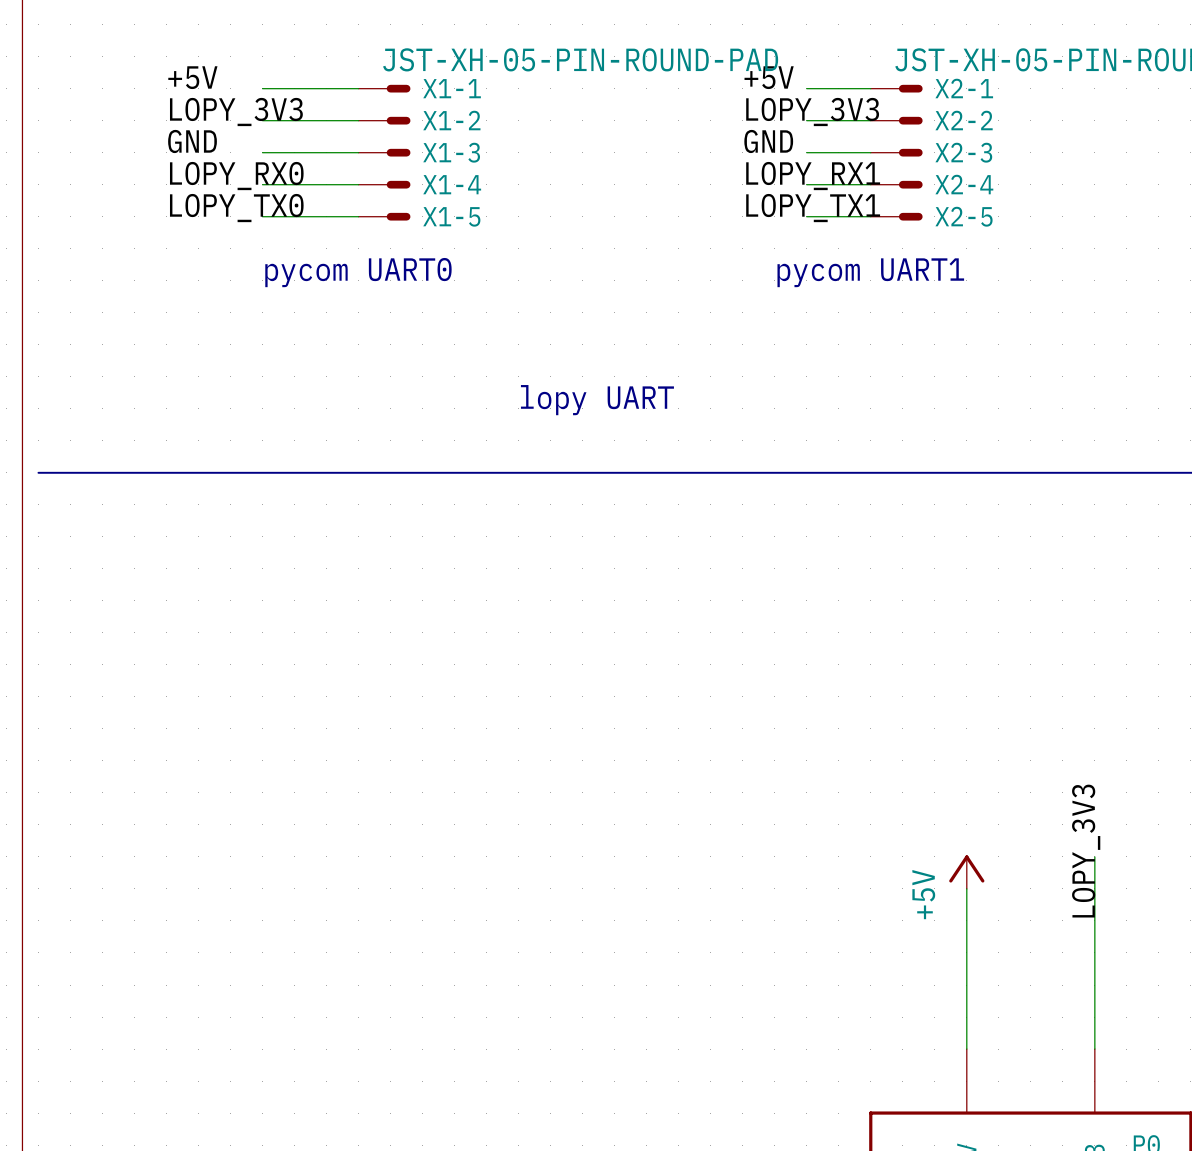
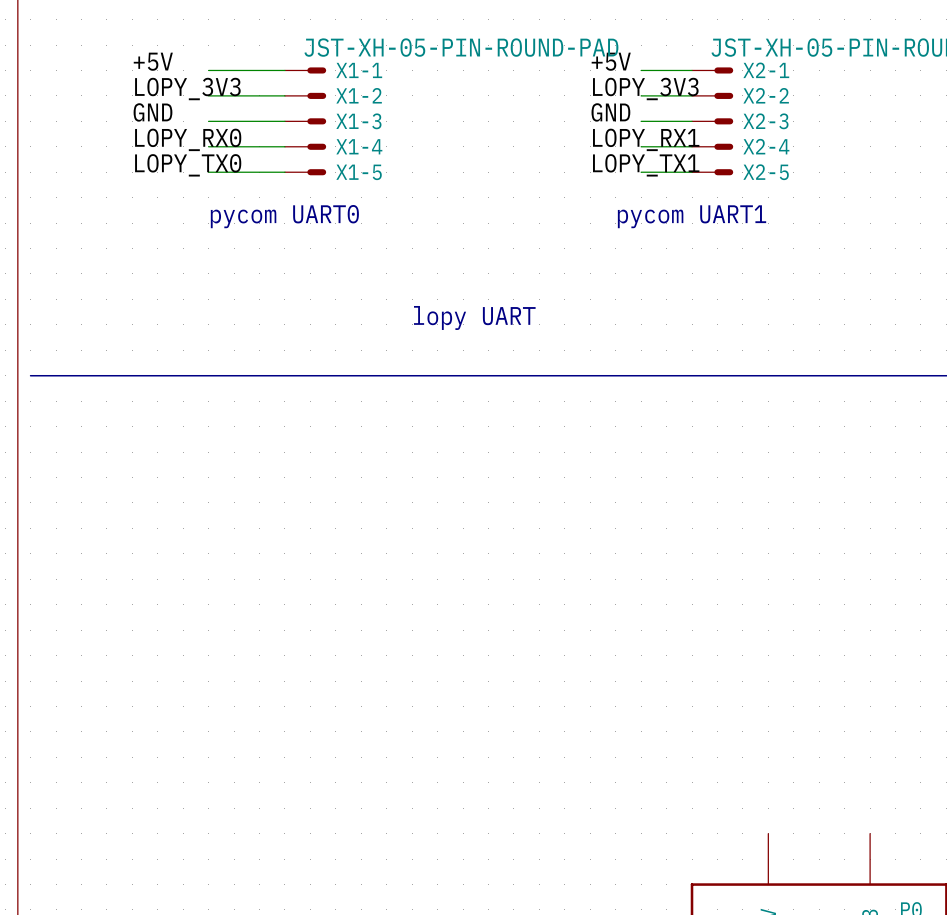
label: LOPY_3V3 (1086, 851) -> none
wire: (1094, 856) (1094, 1049) -> none
power symbol: +5V (966, 872) -> none
wire: (966, 888) (966, 1049) -> none

